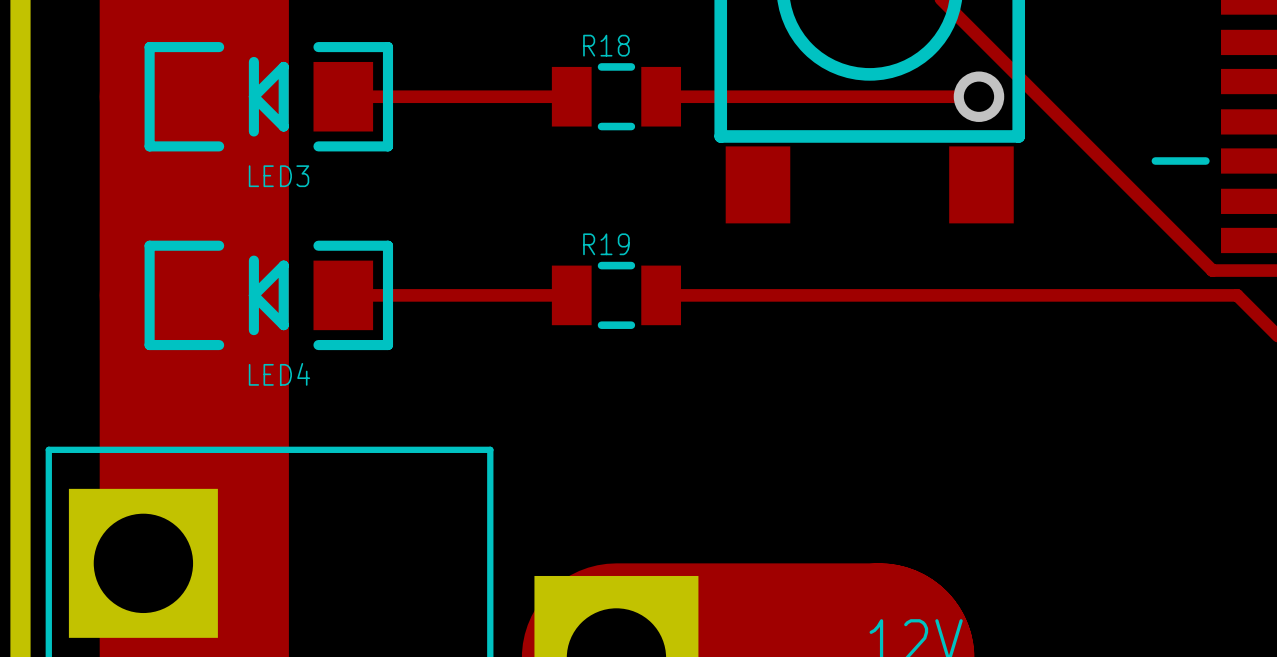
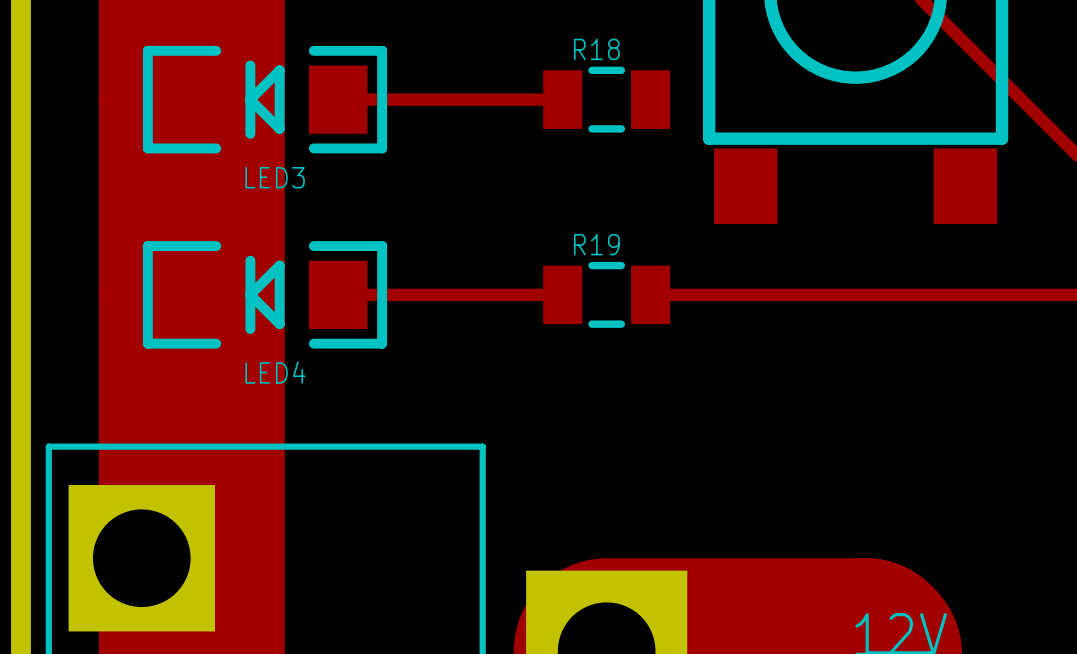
track: (661, 96) (978, 96) -> none
via: (978, 96) -> none

